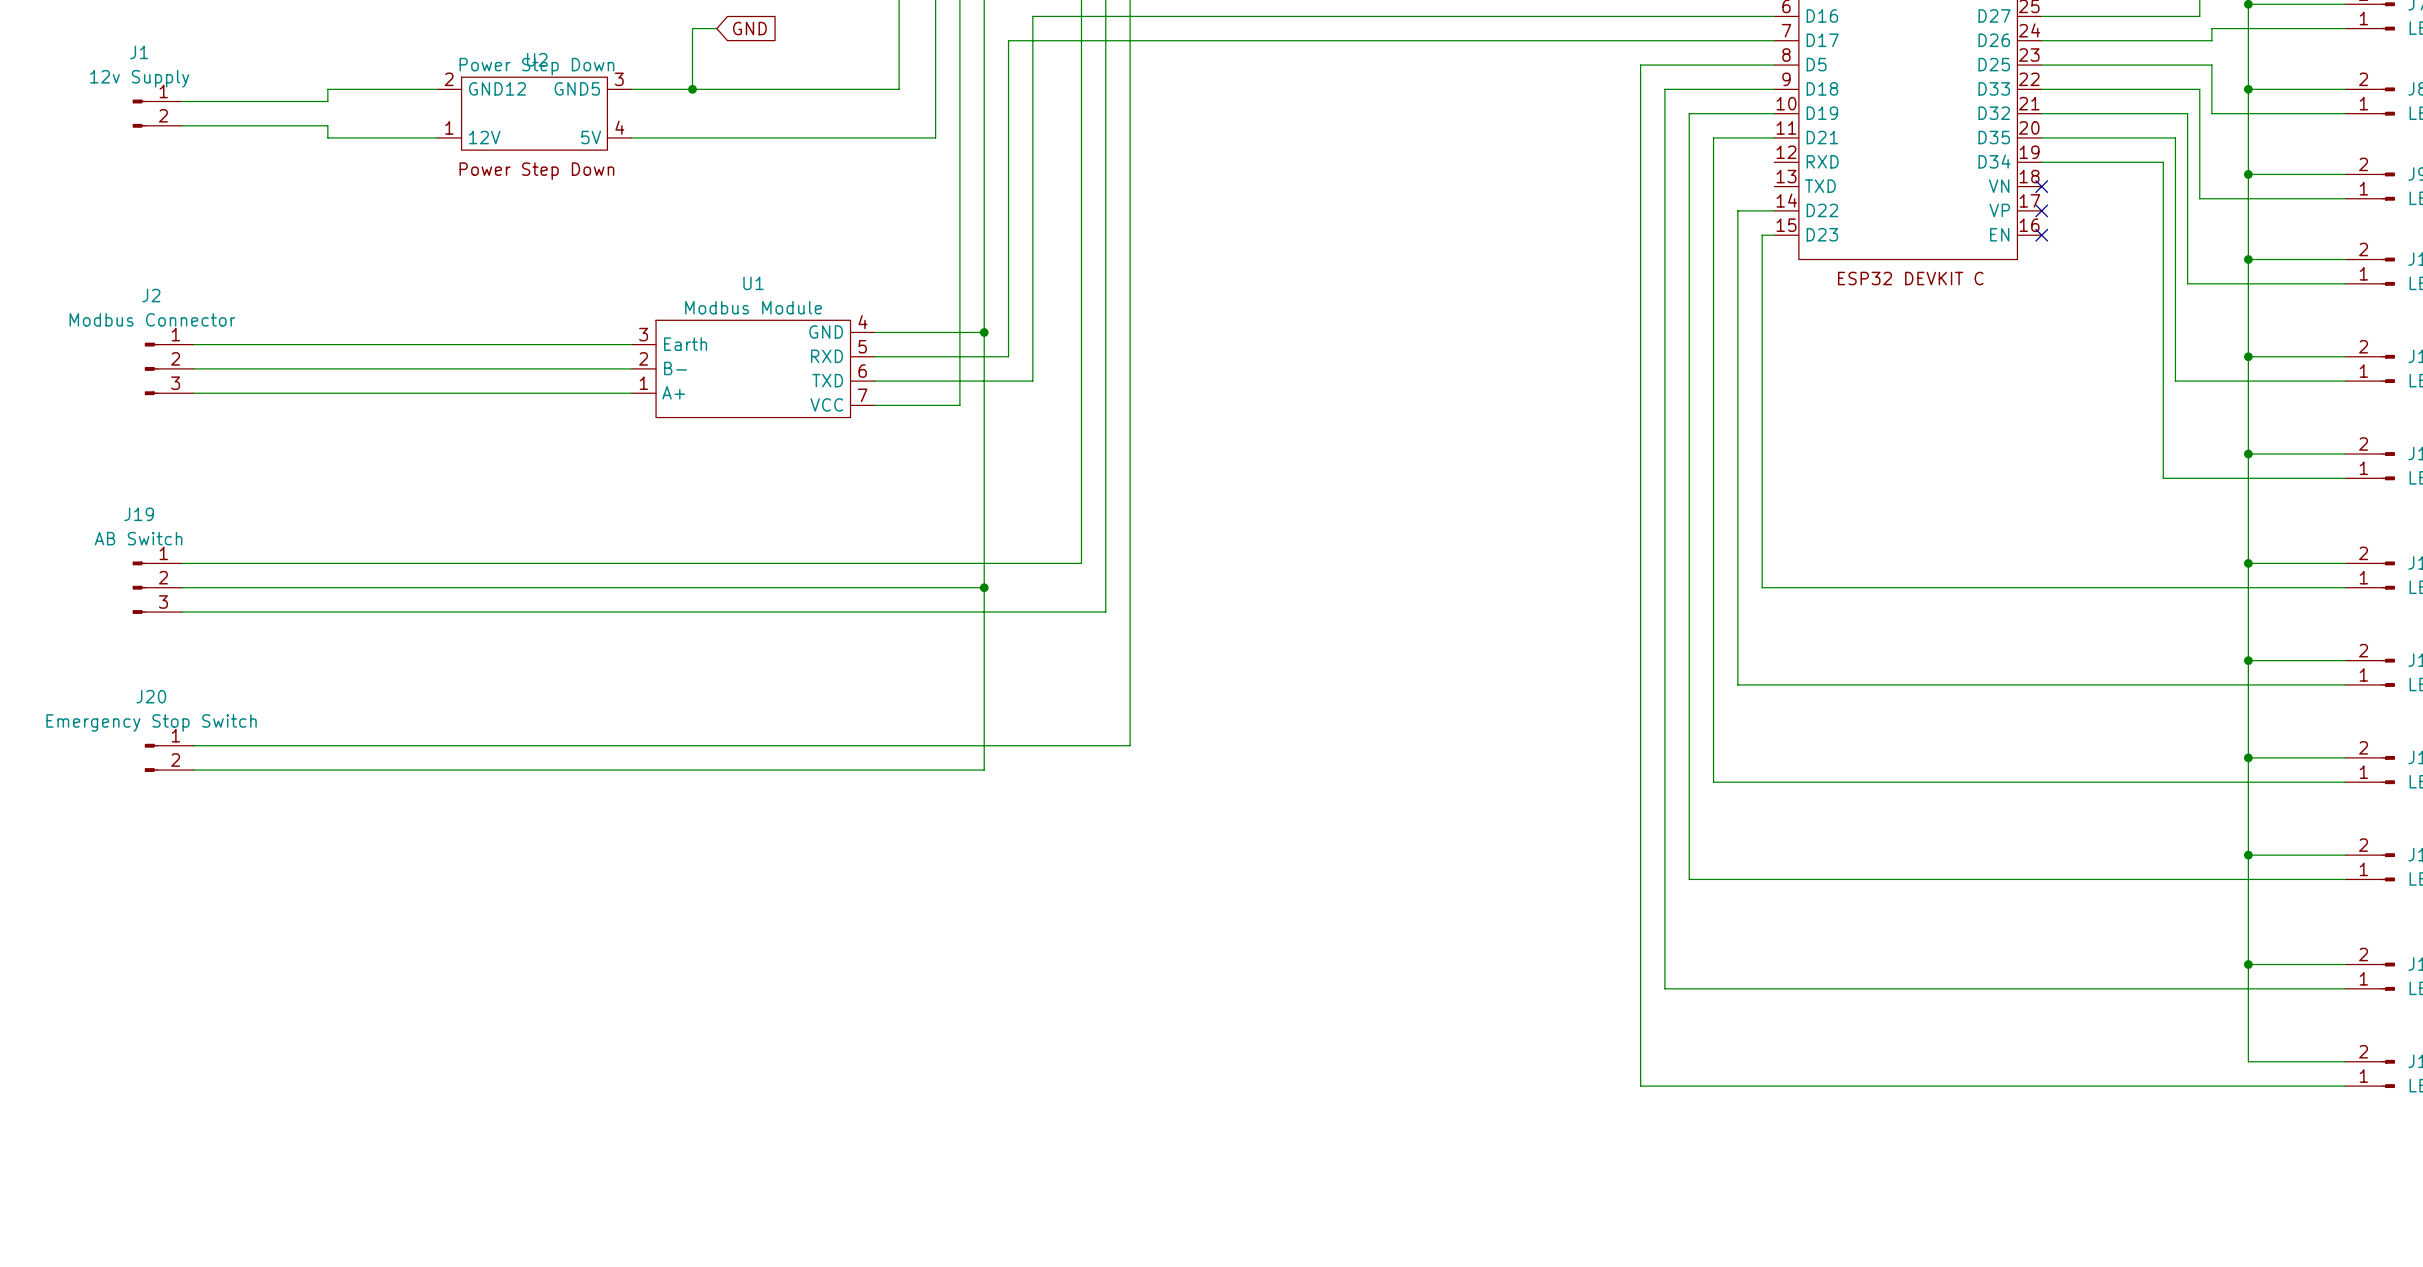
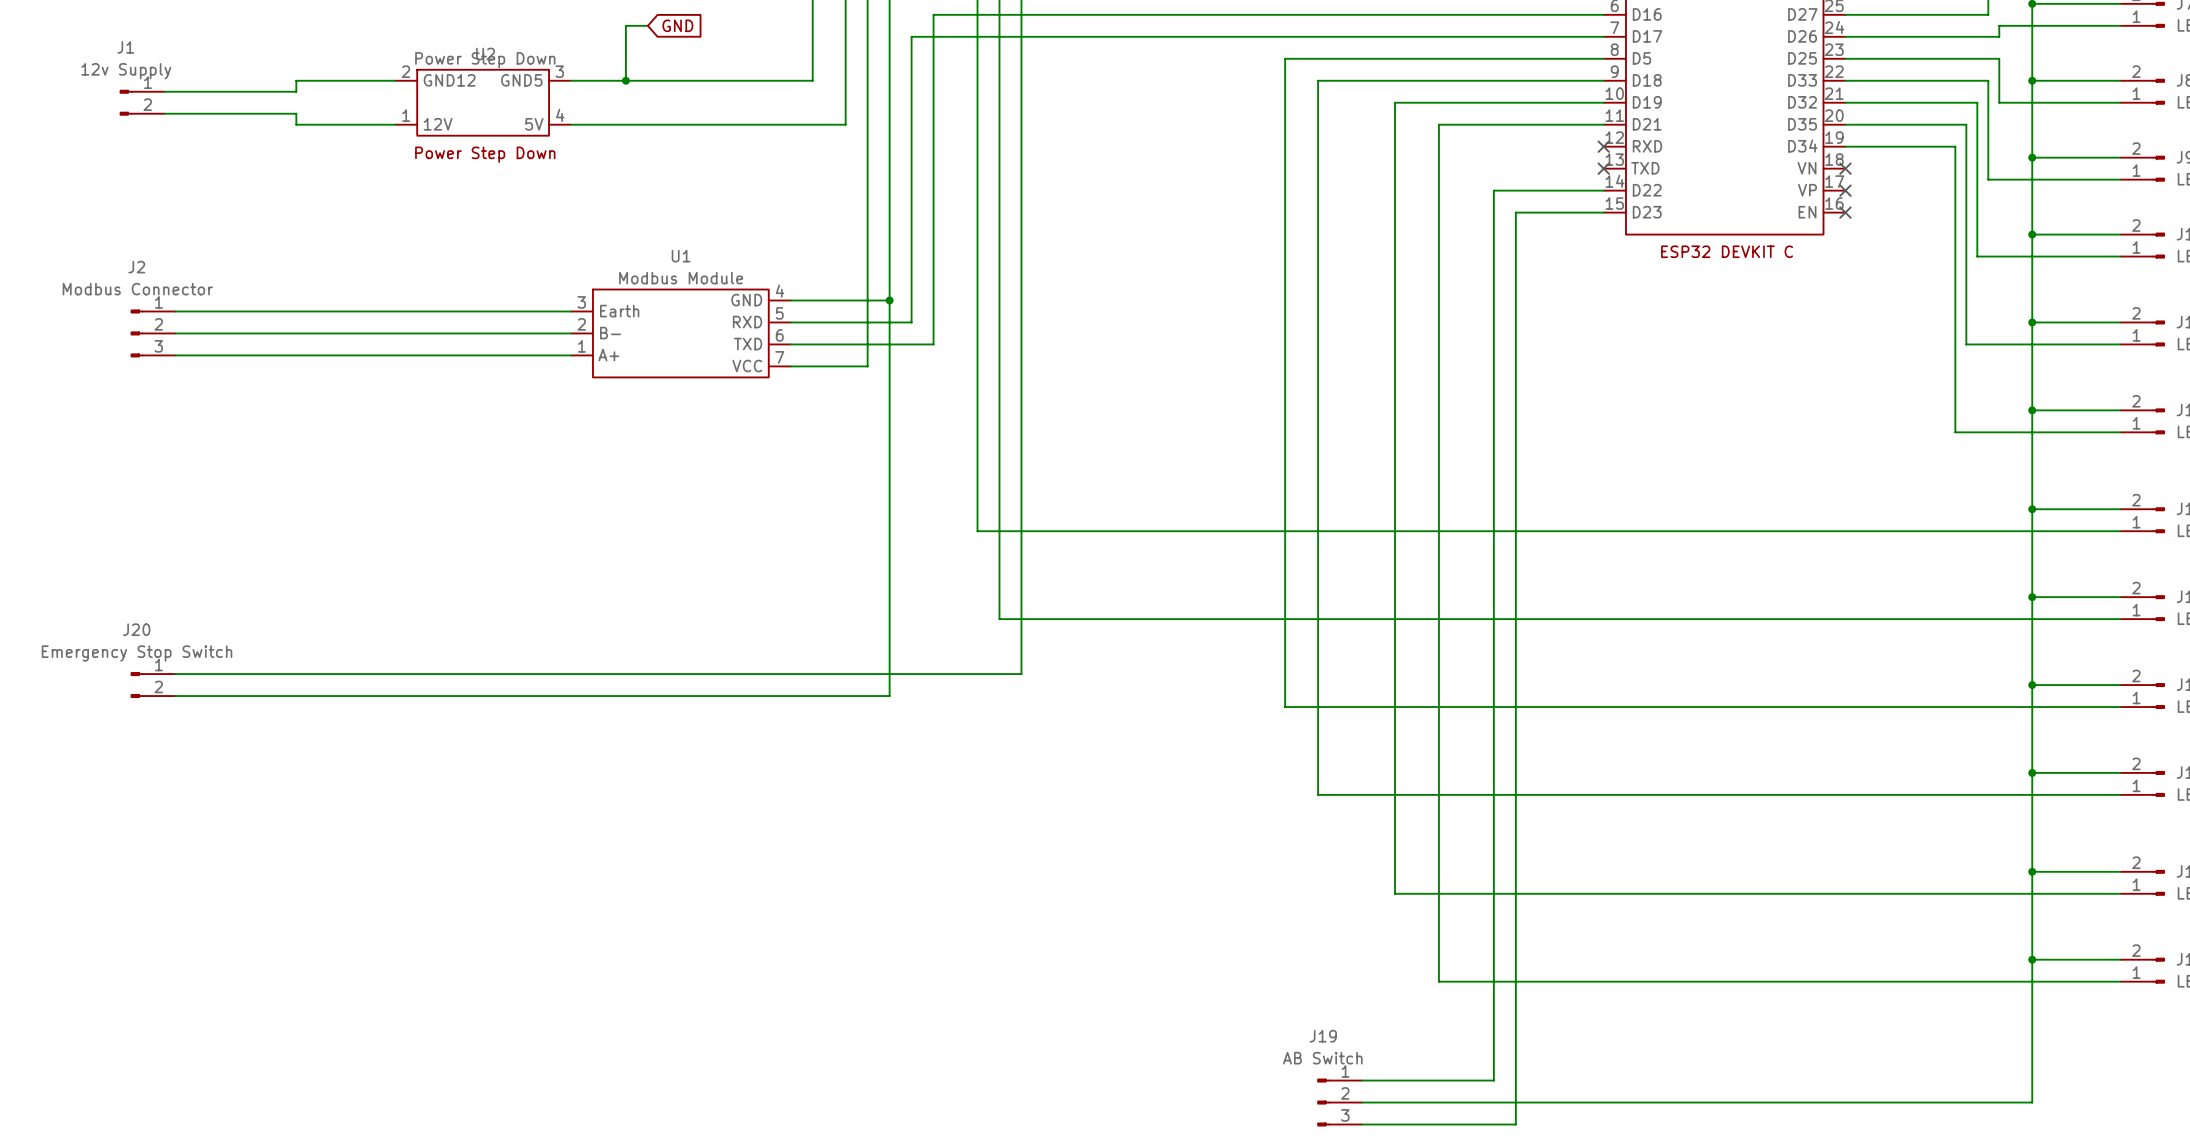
wire: (1640, 65) (1640, 1086) -> (1548, 124) (1438, 124) (1438, 981) (1482, 981)
wire: (1664, 89) (1664, 988) -> (1526, 102) (1395, 102) (1395, 893) (1504, 893)
wire: (1689, 113) (1689, 879) -> (1504, 80) (1318, 80) (1318, 794) (1526, 794)
wire: (1713, 137) (1713, 782) -> (1482, 58) (1285, 58) (1285, 707) (1548, 707)
no-connect mark: none -> (1603, 146)
no-connect mark: none -> (1603, 168)
wire: (1737, 210) (1737, 684) -> (1570, 190) (1493, 190) (1493, 1080) (1362, 1080)
wire: (1762, 235) (1762, 587) -> (1592, 212) (1515, 212) (1515, 1124) (1362, 1124)
wire: (181, 563) (1081, 563) -> (1592, 531) (977, 531) (977, 509)
J19 position: (157, 587) -> (1339, 1102)
wire: (181, 587) (984, 587) -> none
junction: (984, 587) -> none
wire: (181, 612) (1105, 612) -> (1570, 619) (999, 619) (999, 553)
wire: none -> (2032, 959) (2032, 1102) (1362, 1102)
junction: none -> (2032, 959)

